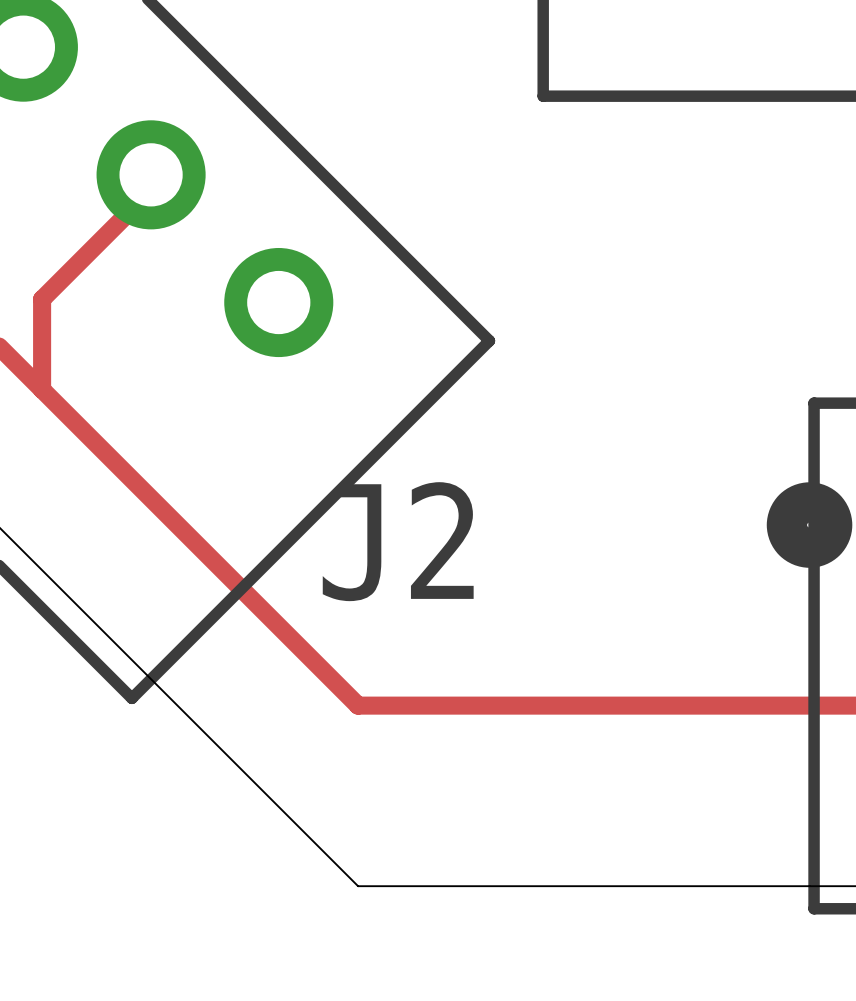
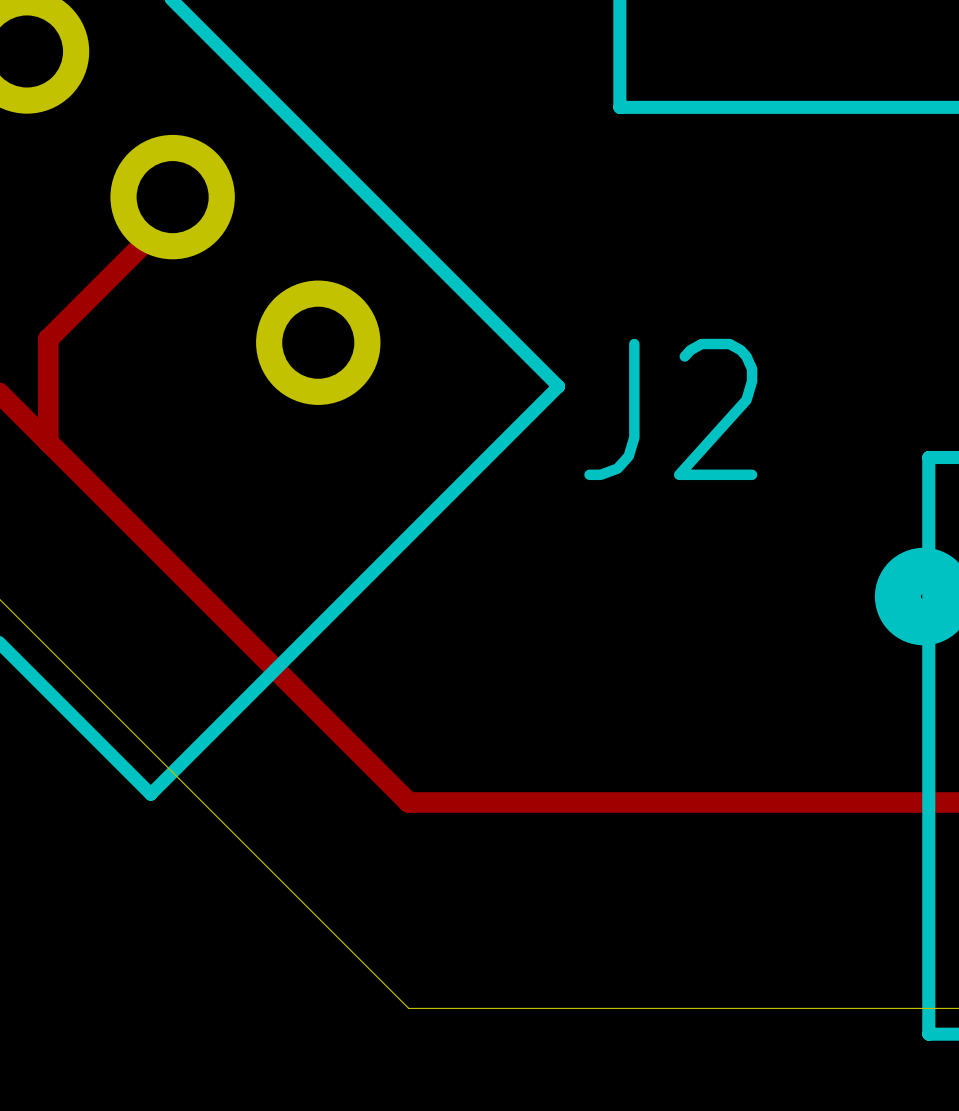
J2 name position: J2 (398, 541) -> J2 (670, 409)

